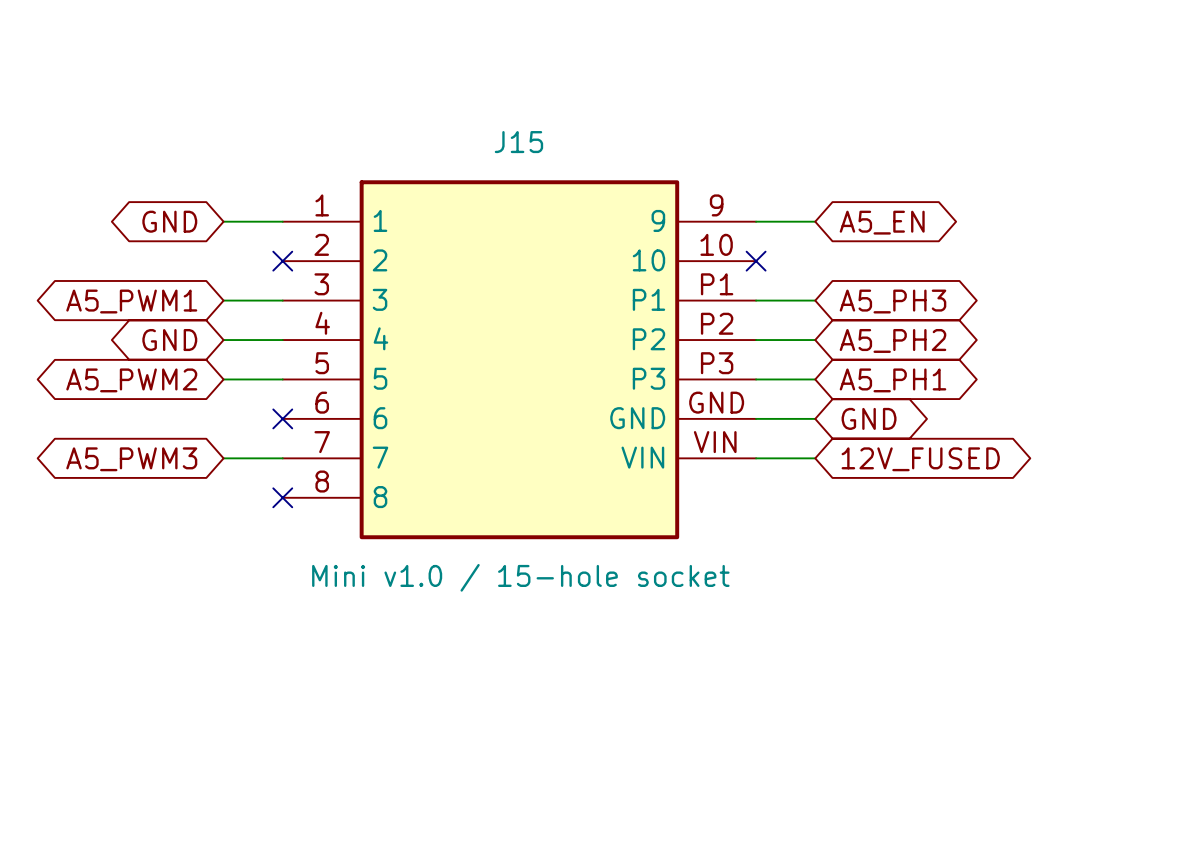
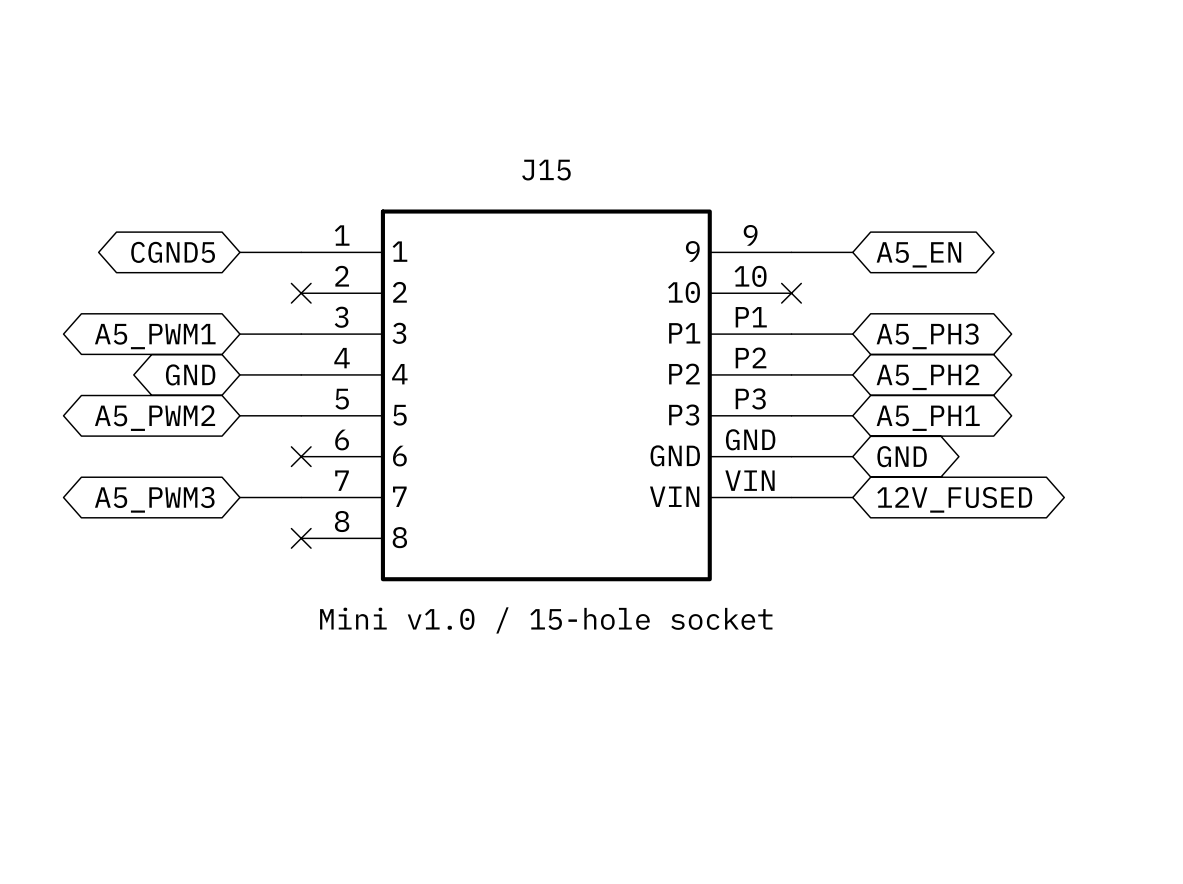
global label: GND (169, 221) -> CGND5 (173, 252)

